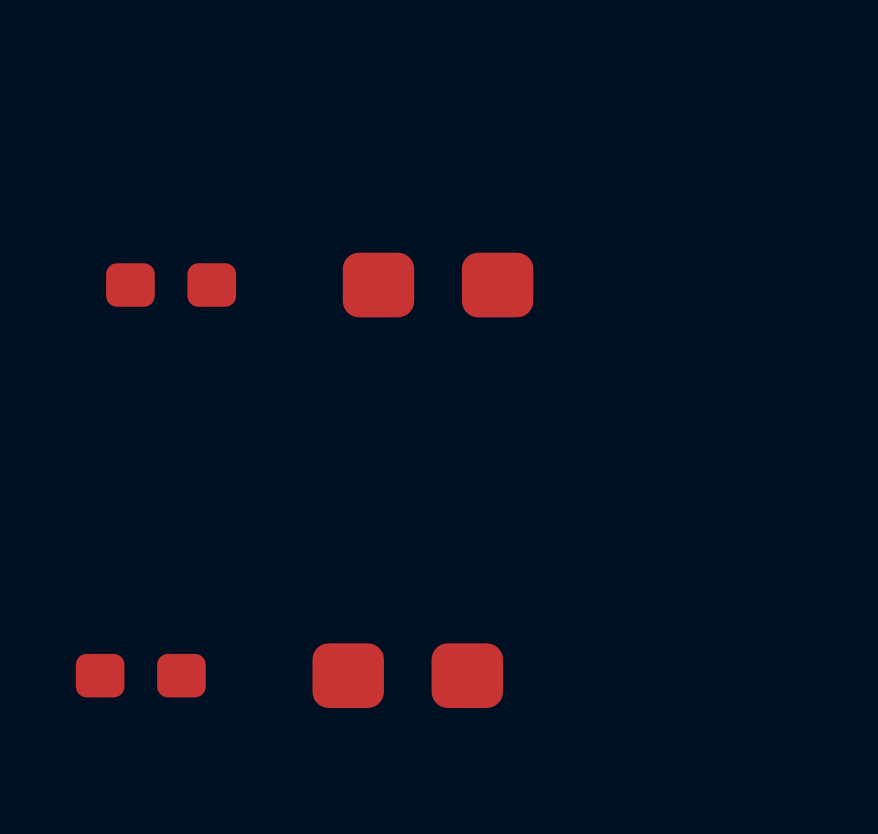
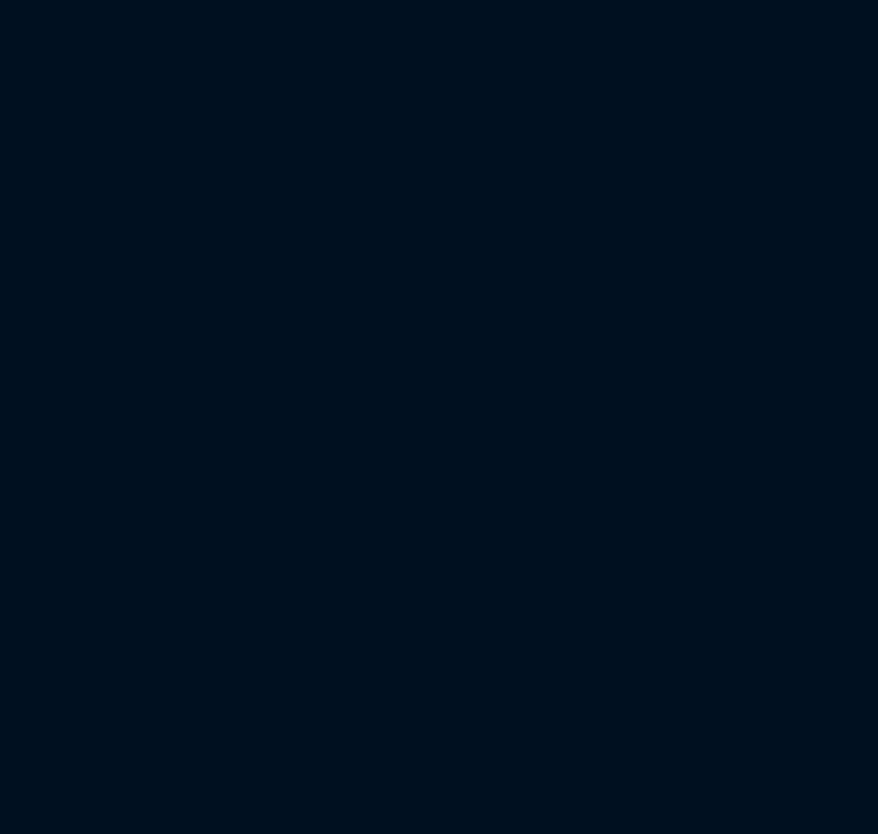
part: (171, 285) -> none
part: (438, 285) -> none
part: (140, 675) -> none
part: (407, 675) -> none

